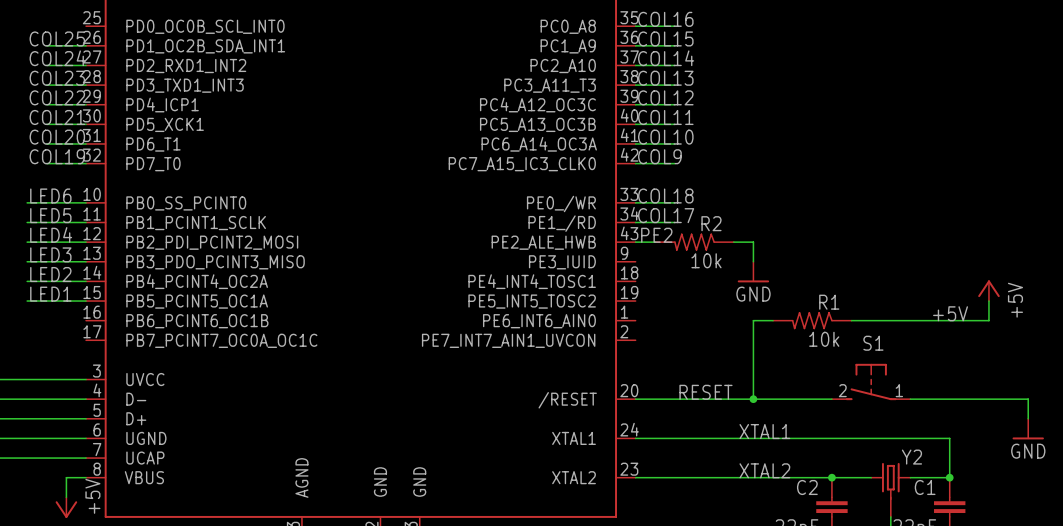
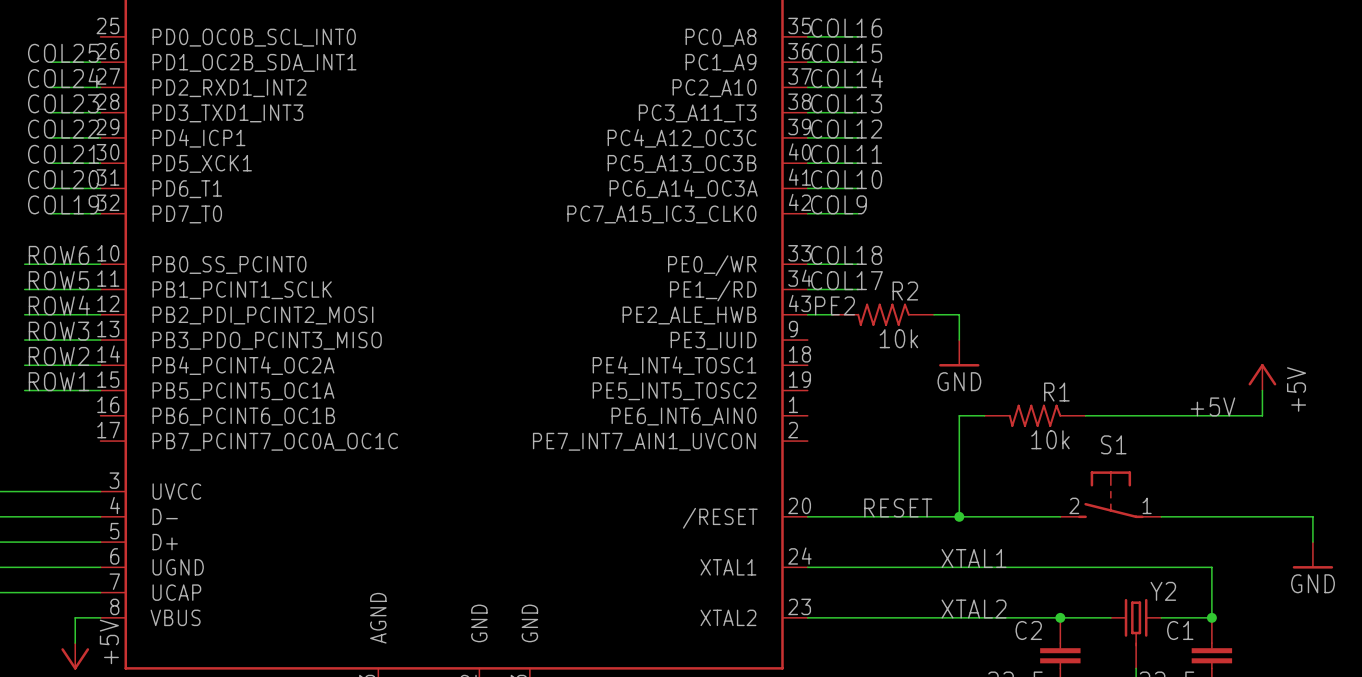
label: LED6 (50, 196) -> ROW6 (58, 255)
label: LED5 (50, 215) -> ROW5 (58, 280)
label: LED4 (51, 234) -> ROW4 (59, 305)
label: LED3 (50, 254) -> ROW3 (58, 331)
label: LED2 (50, 274) -> ROW2 (58, 356)
label: LED1 (50, 294) -> ROW1 (58, 381)

